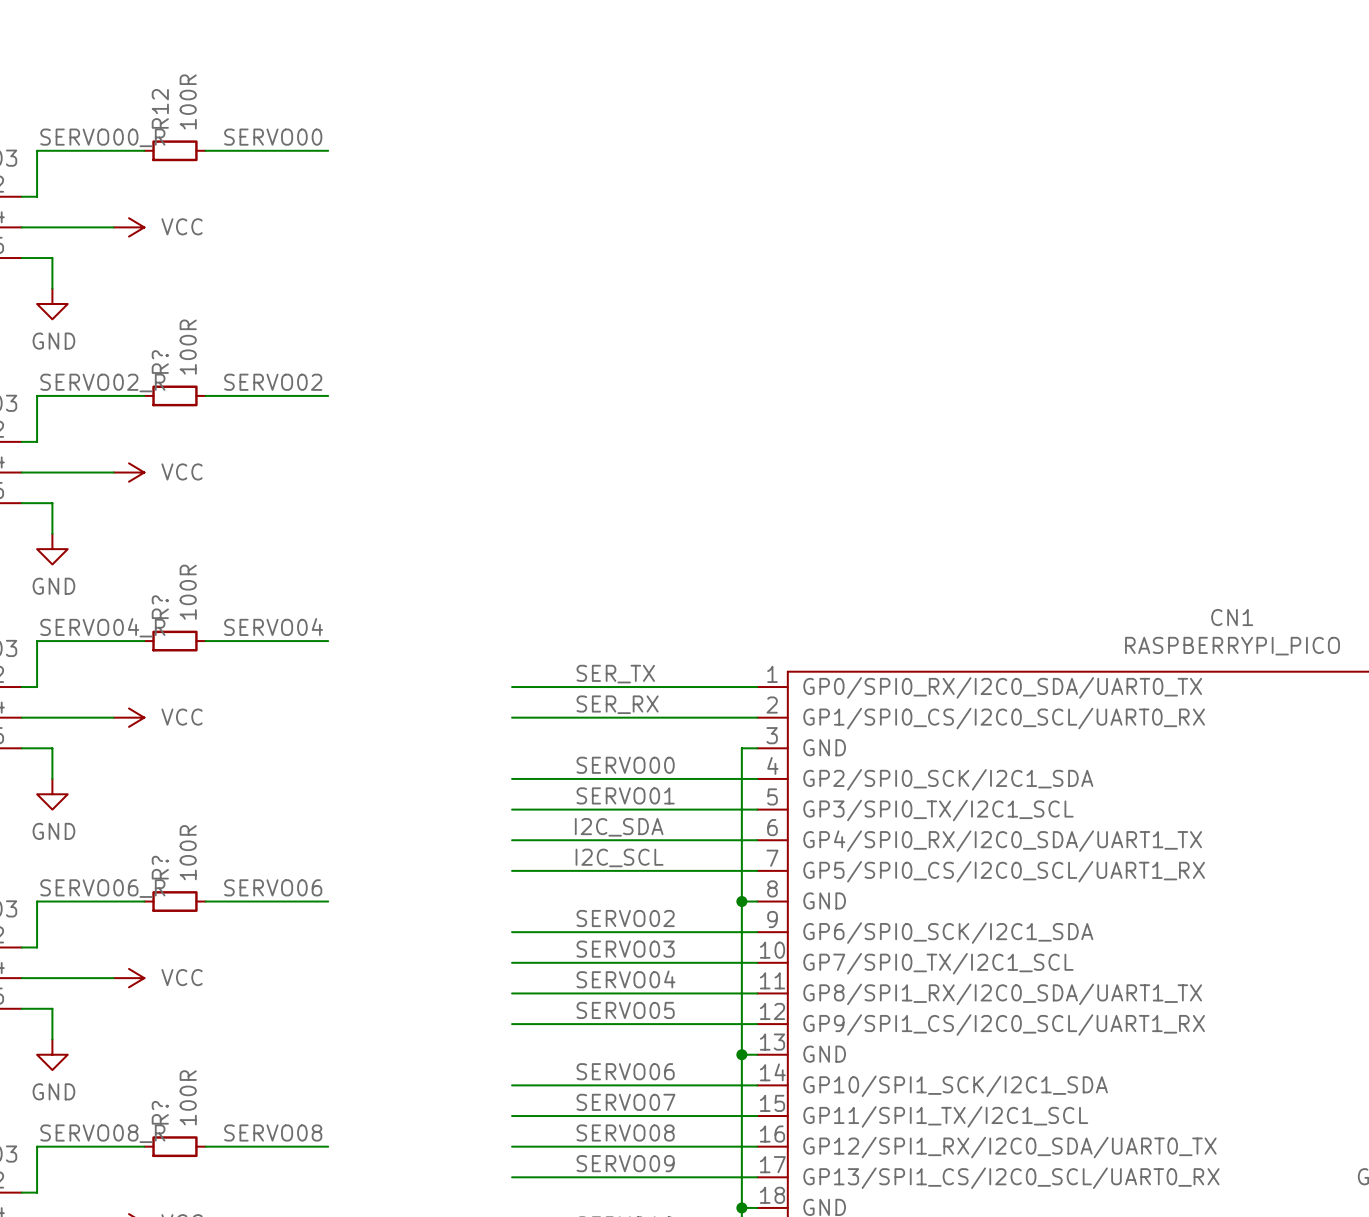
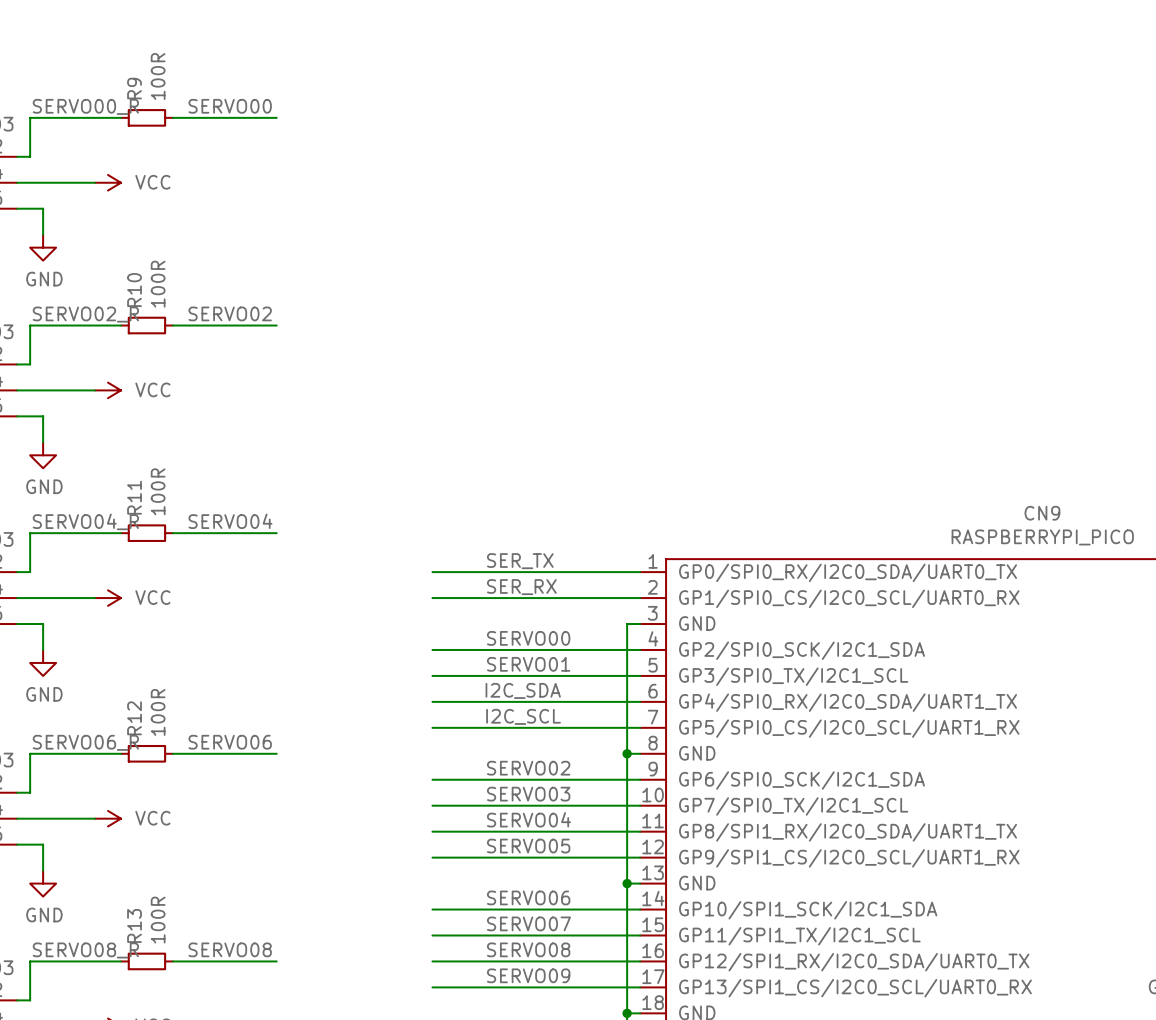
R12 name: R12 (160, 108) -> R9 (134, 88)
R? name: R? (160, 362) -> R10 (134, 290)
R? name: R? (160, 607) -> R11 (134, 497)
CN1 name: CN1 (1232, 617) -> CN9 (1042, 513)
R? name: R? (160, 867) -> R12 (134, 718)
R? name: R? (160, 1112) -> R13 (134, 925)

